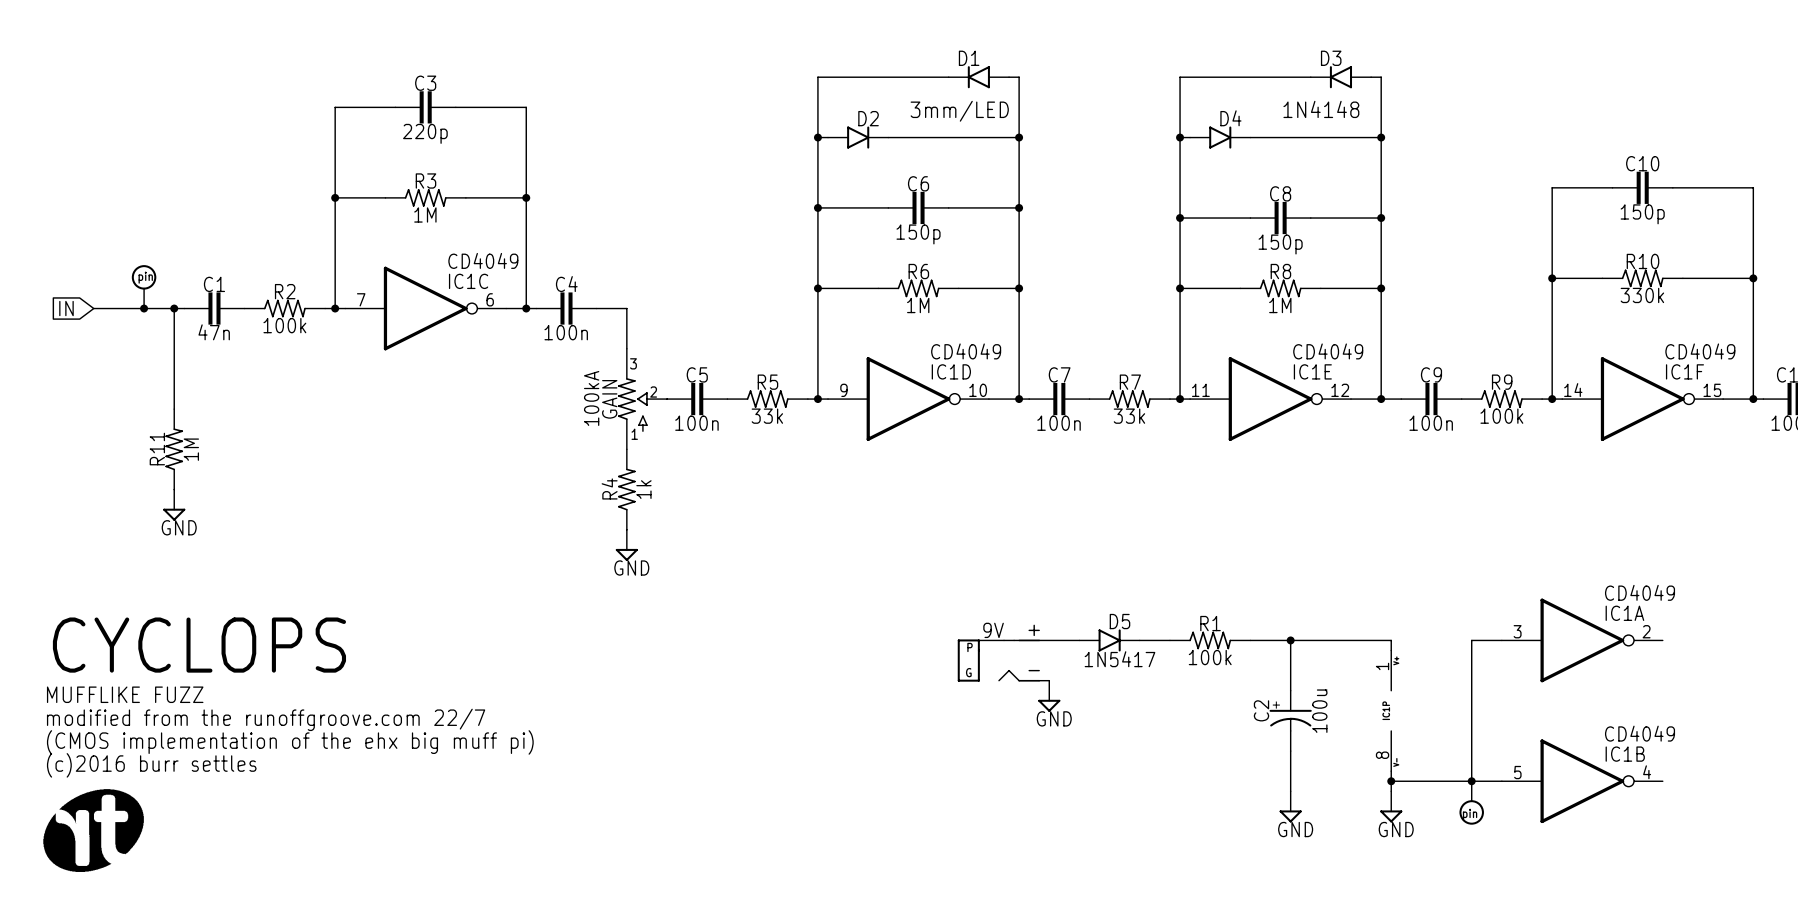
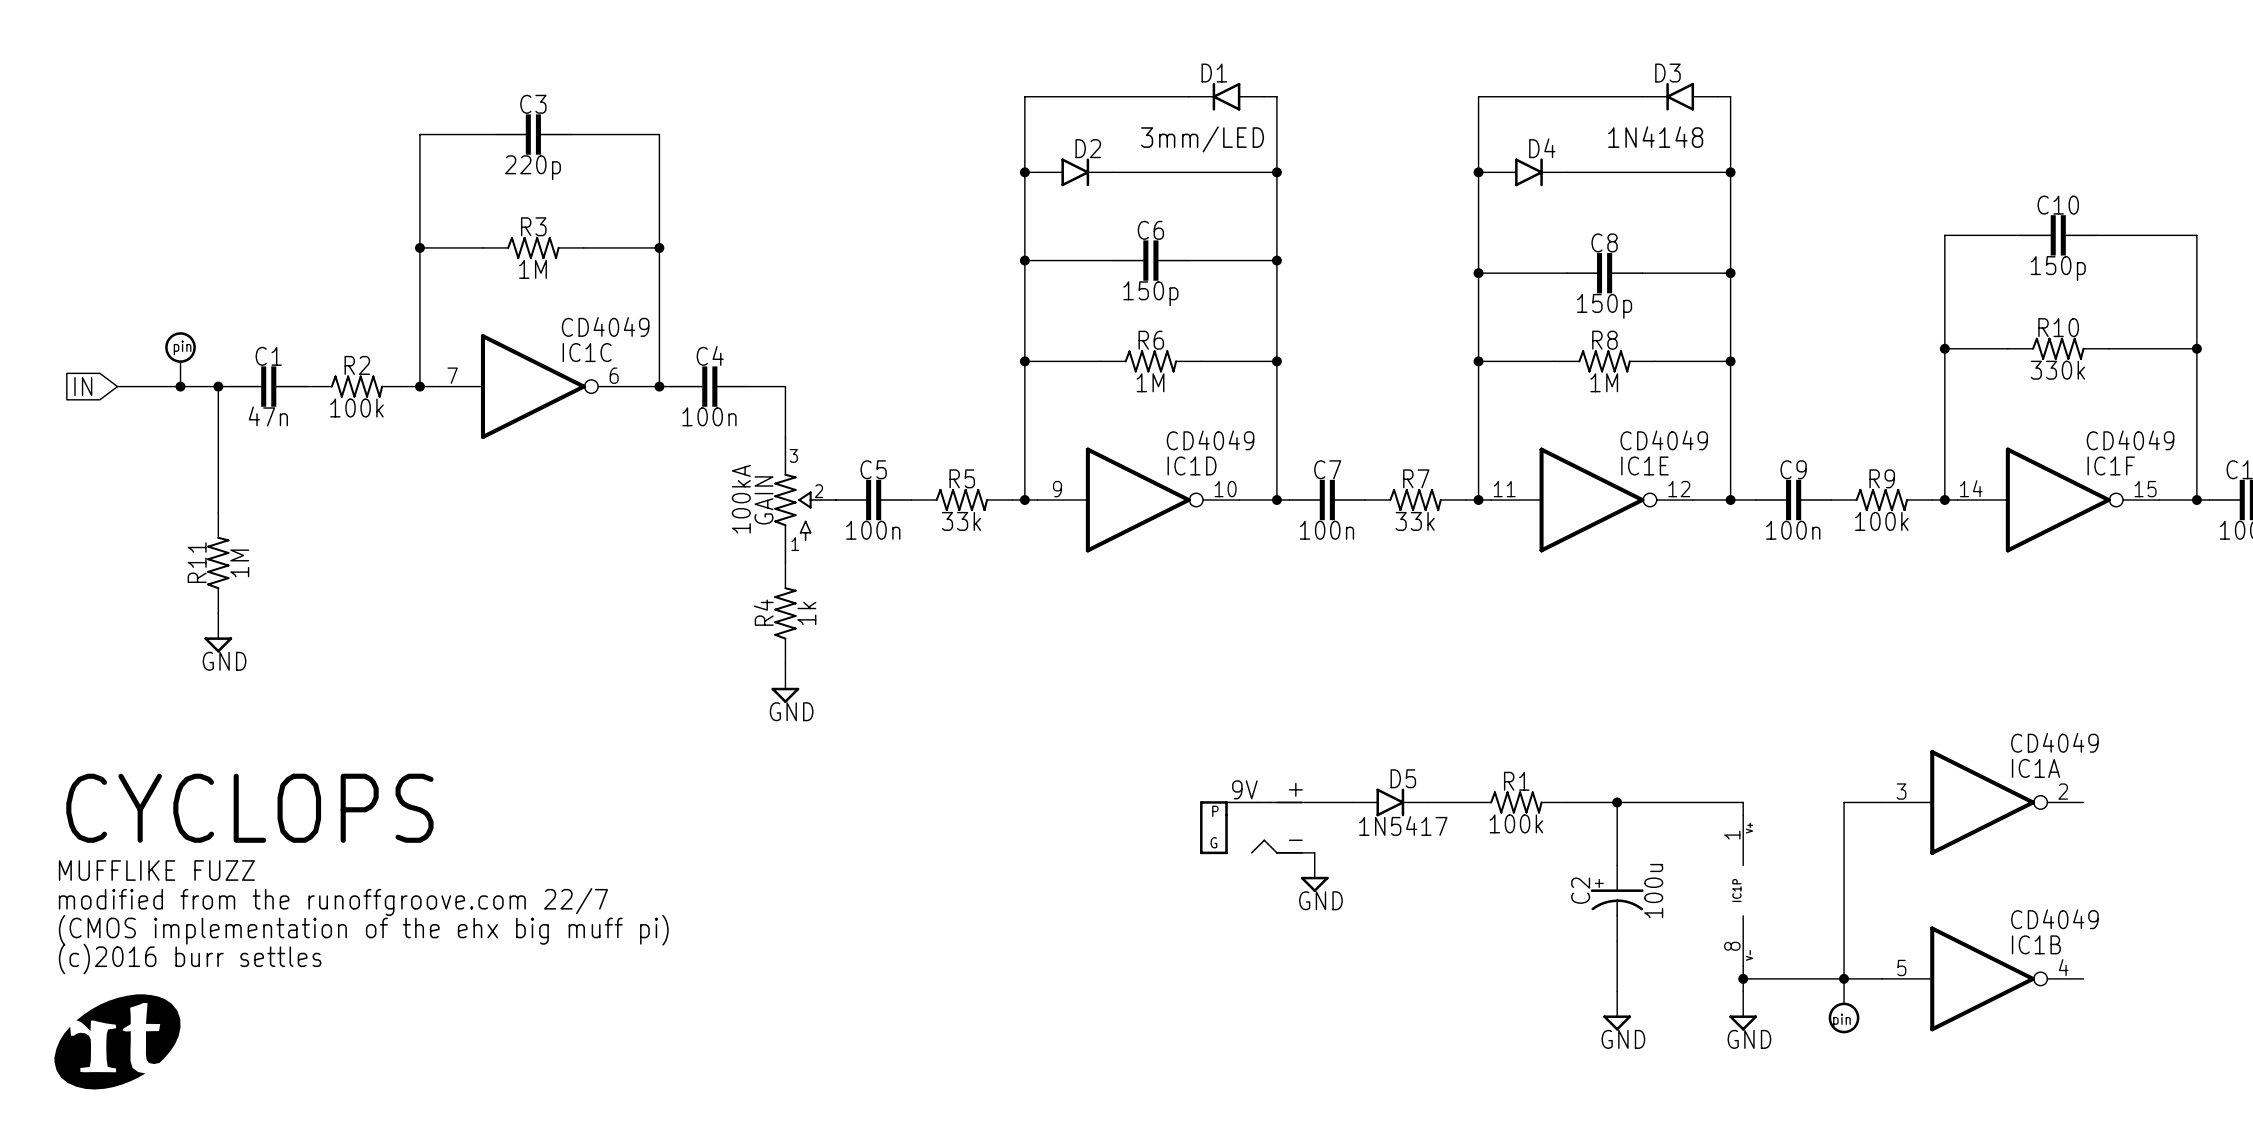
part symbol: [43, 789, 144, 872] -> [54, 994, 181, 1090]

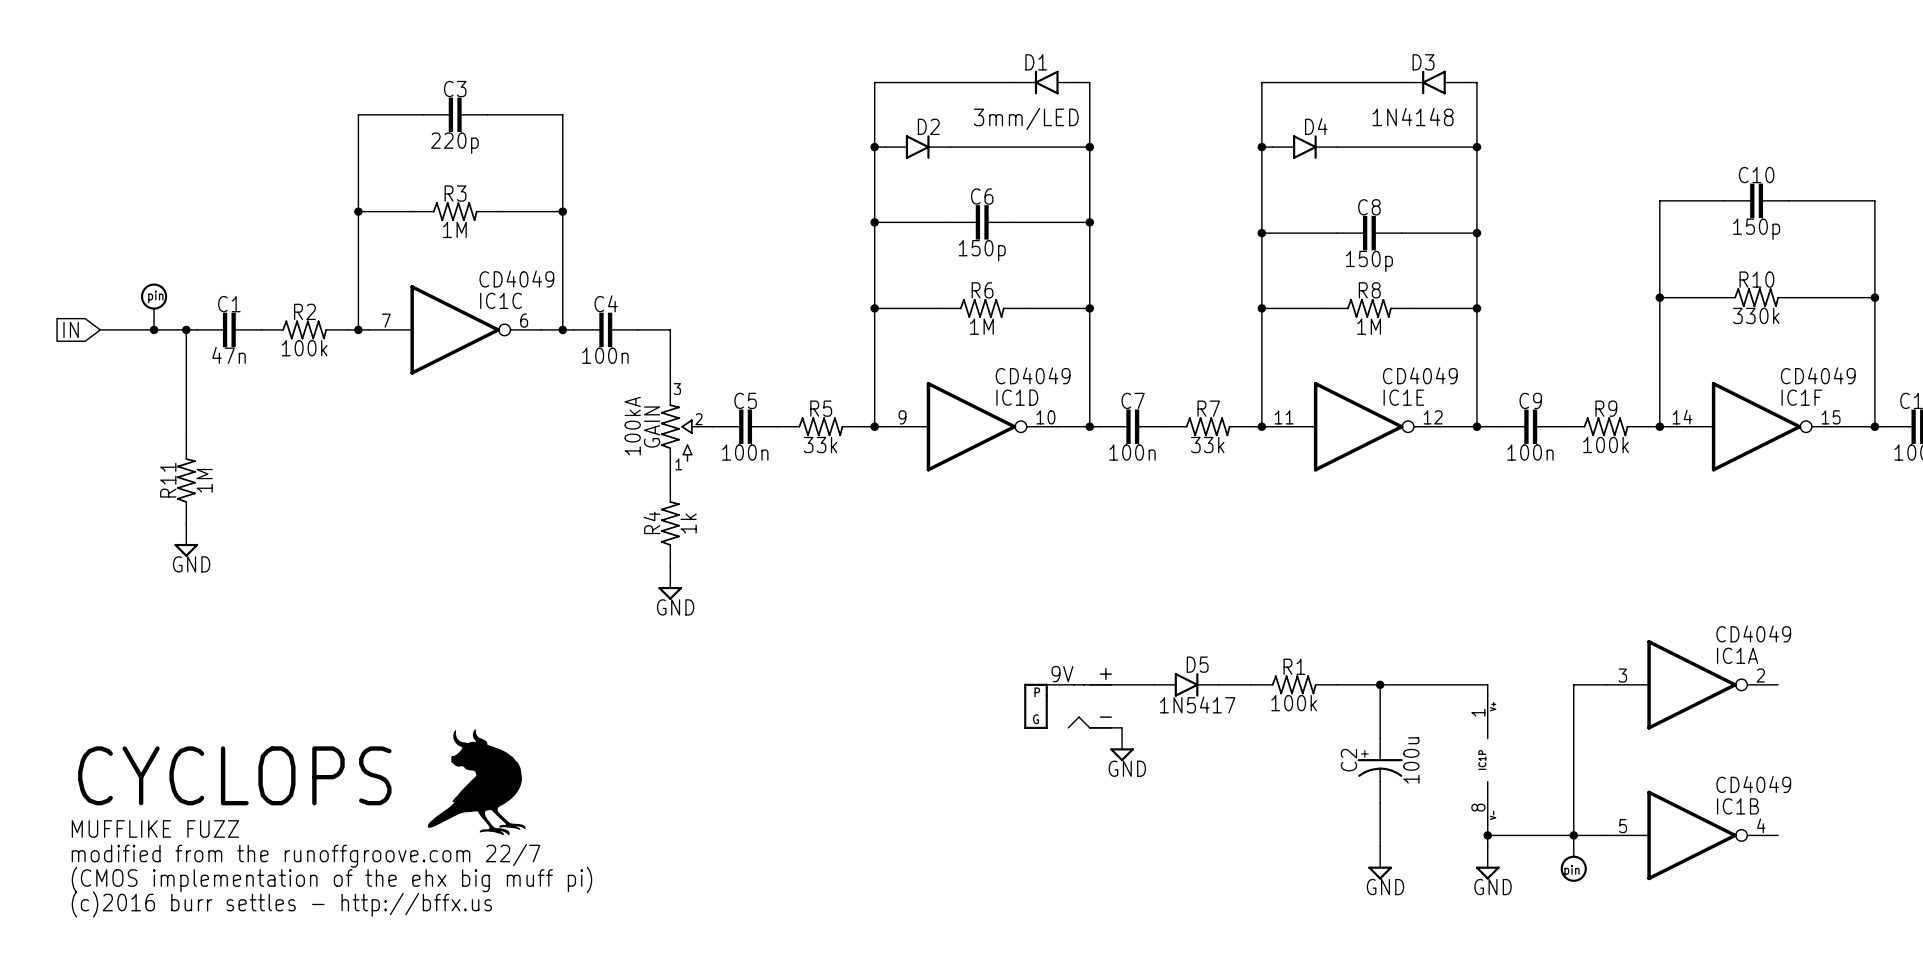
text position: CYCLOPS (249, 808) -> CYCLOPS (234, 775)
text position: MUFFLIKE FUZZ (156, 870) -> MUFFLIKE FUZZ (155, 828)
text position: modified from the runoffgroove.com 22/7 (333, 901) -> modified from the runoffgroove.com 22/7 (306, 855)
part: none -> (476, 781)
text position: (CMOS implementation of the ehx big muff pi) (363, 930) -> (CMOS implementation of the ehx big muff pi) (331, 879)
text: (c)2016 burr settles (190, 958) -> none
part: (117, 1041) -> none
text: none -> (c)2016 burr settles - http://bffx.us (281, 904)

